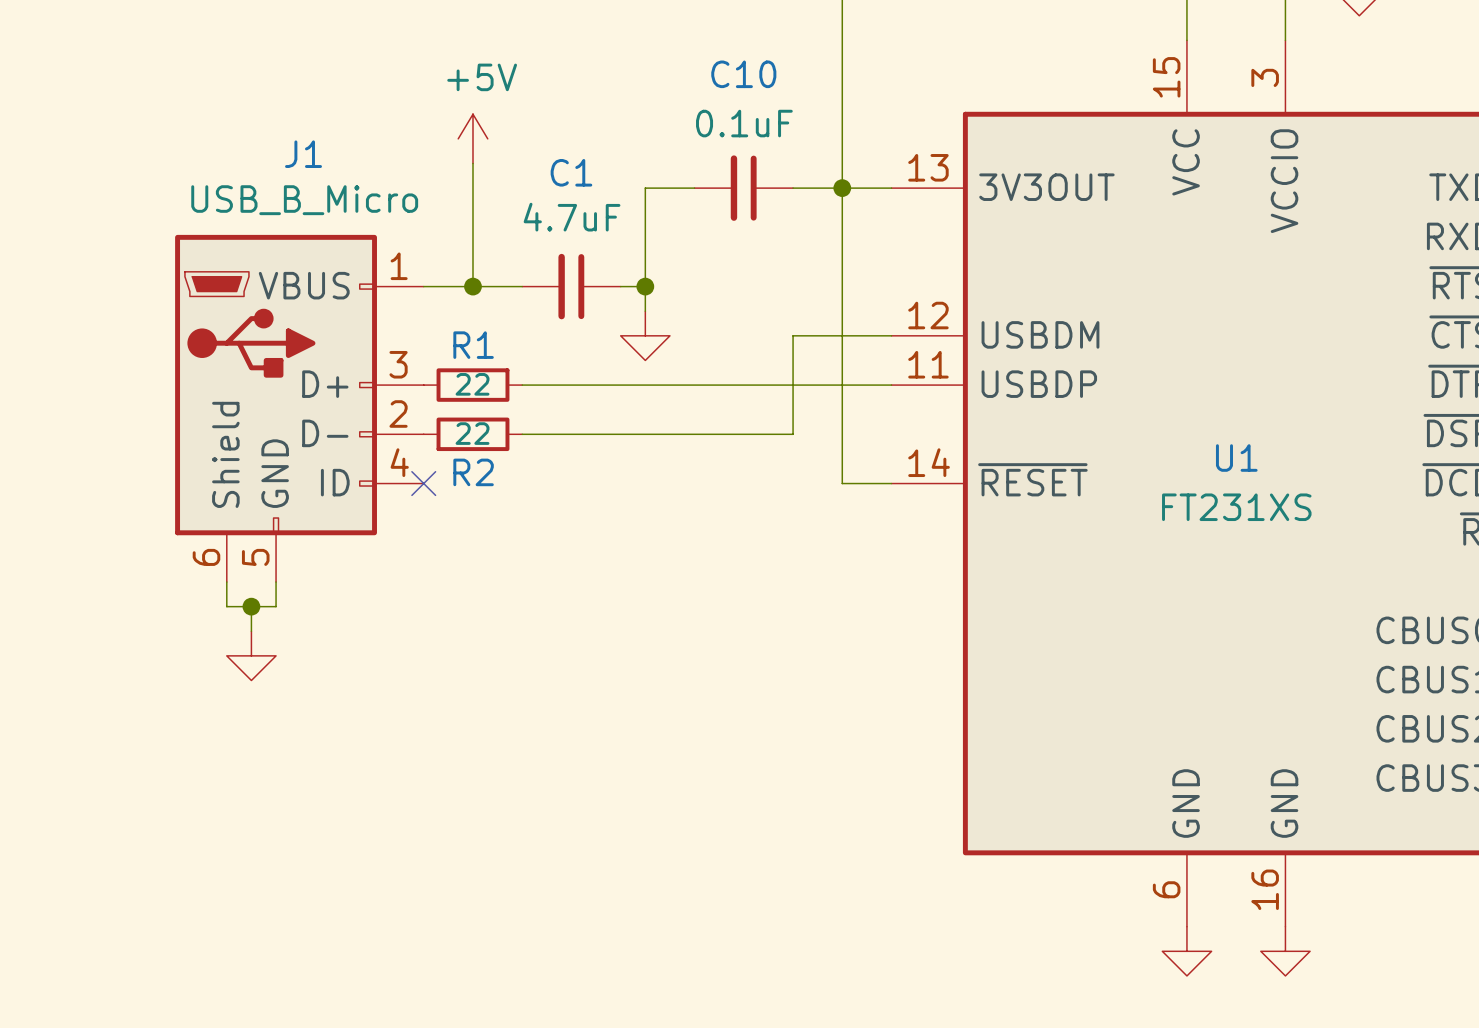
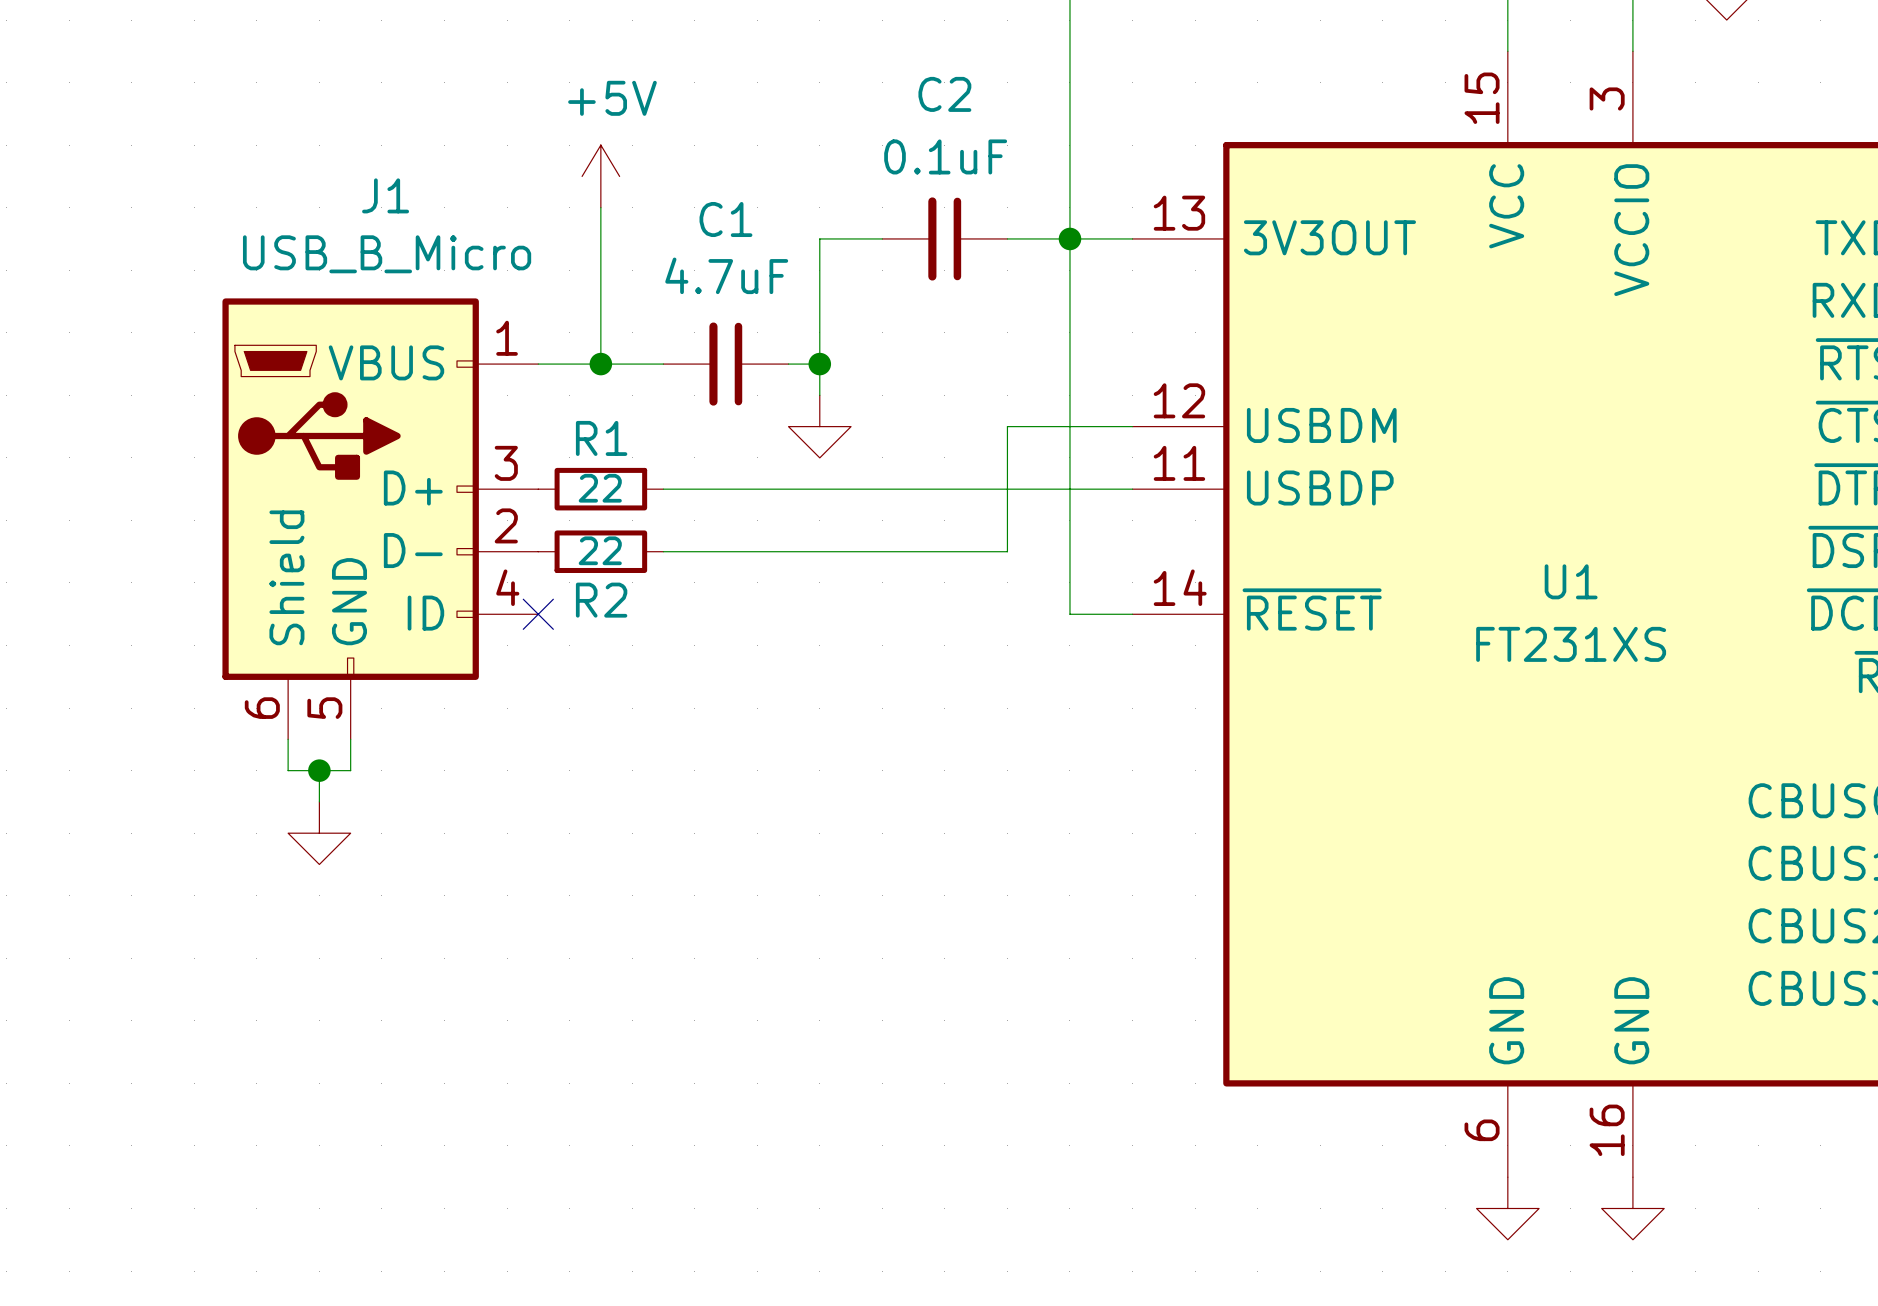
C10 name: C10 (743, 74) -> C2 (944, 94)

